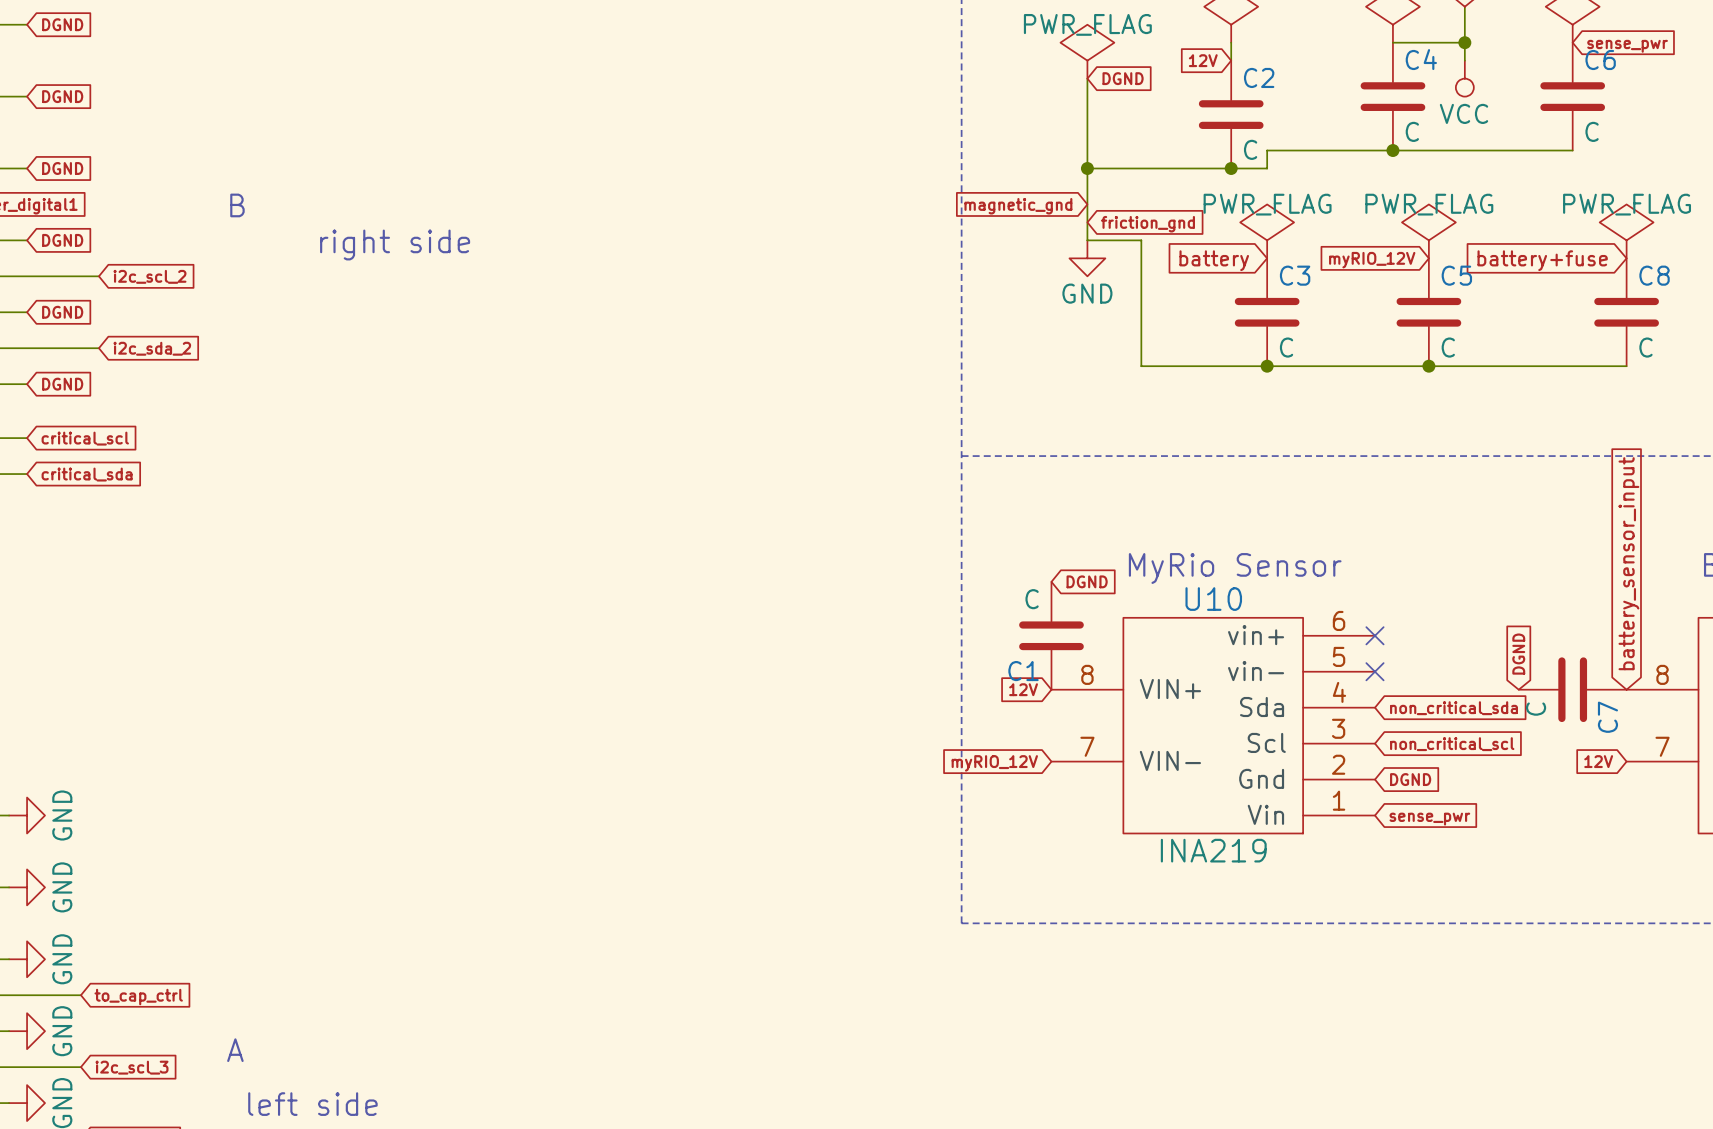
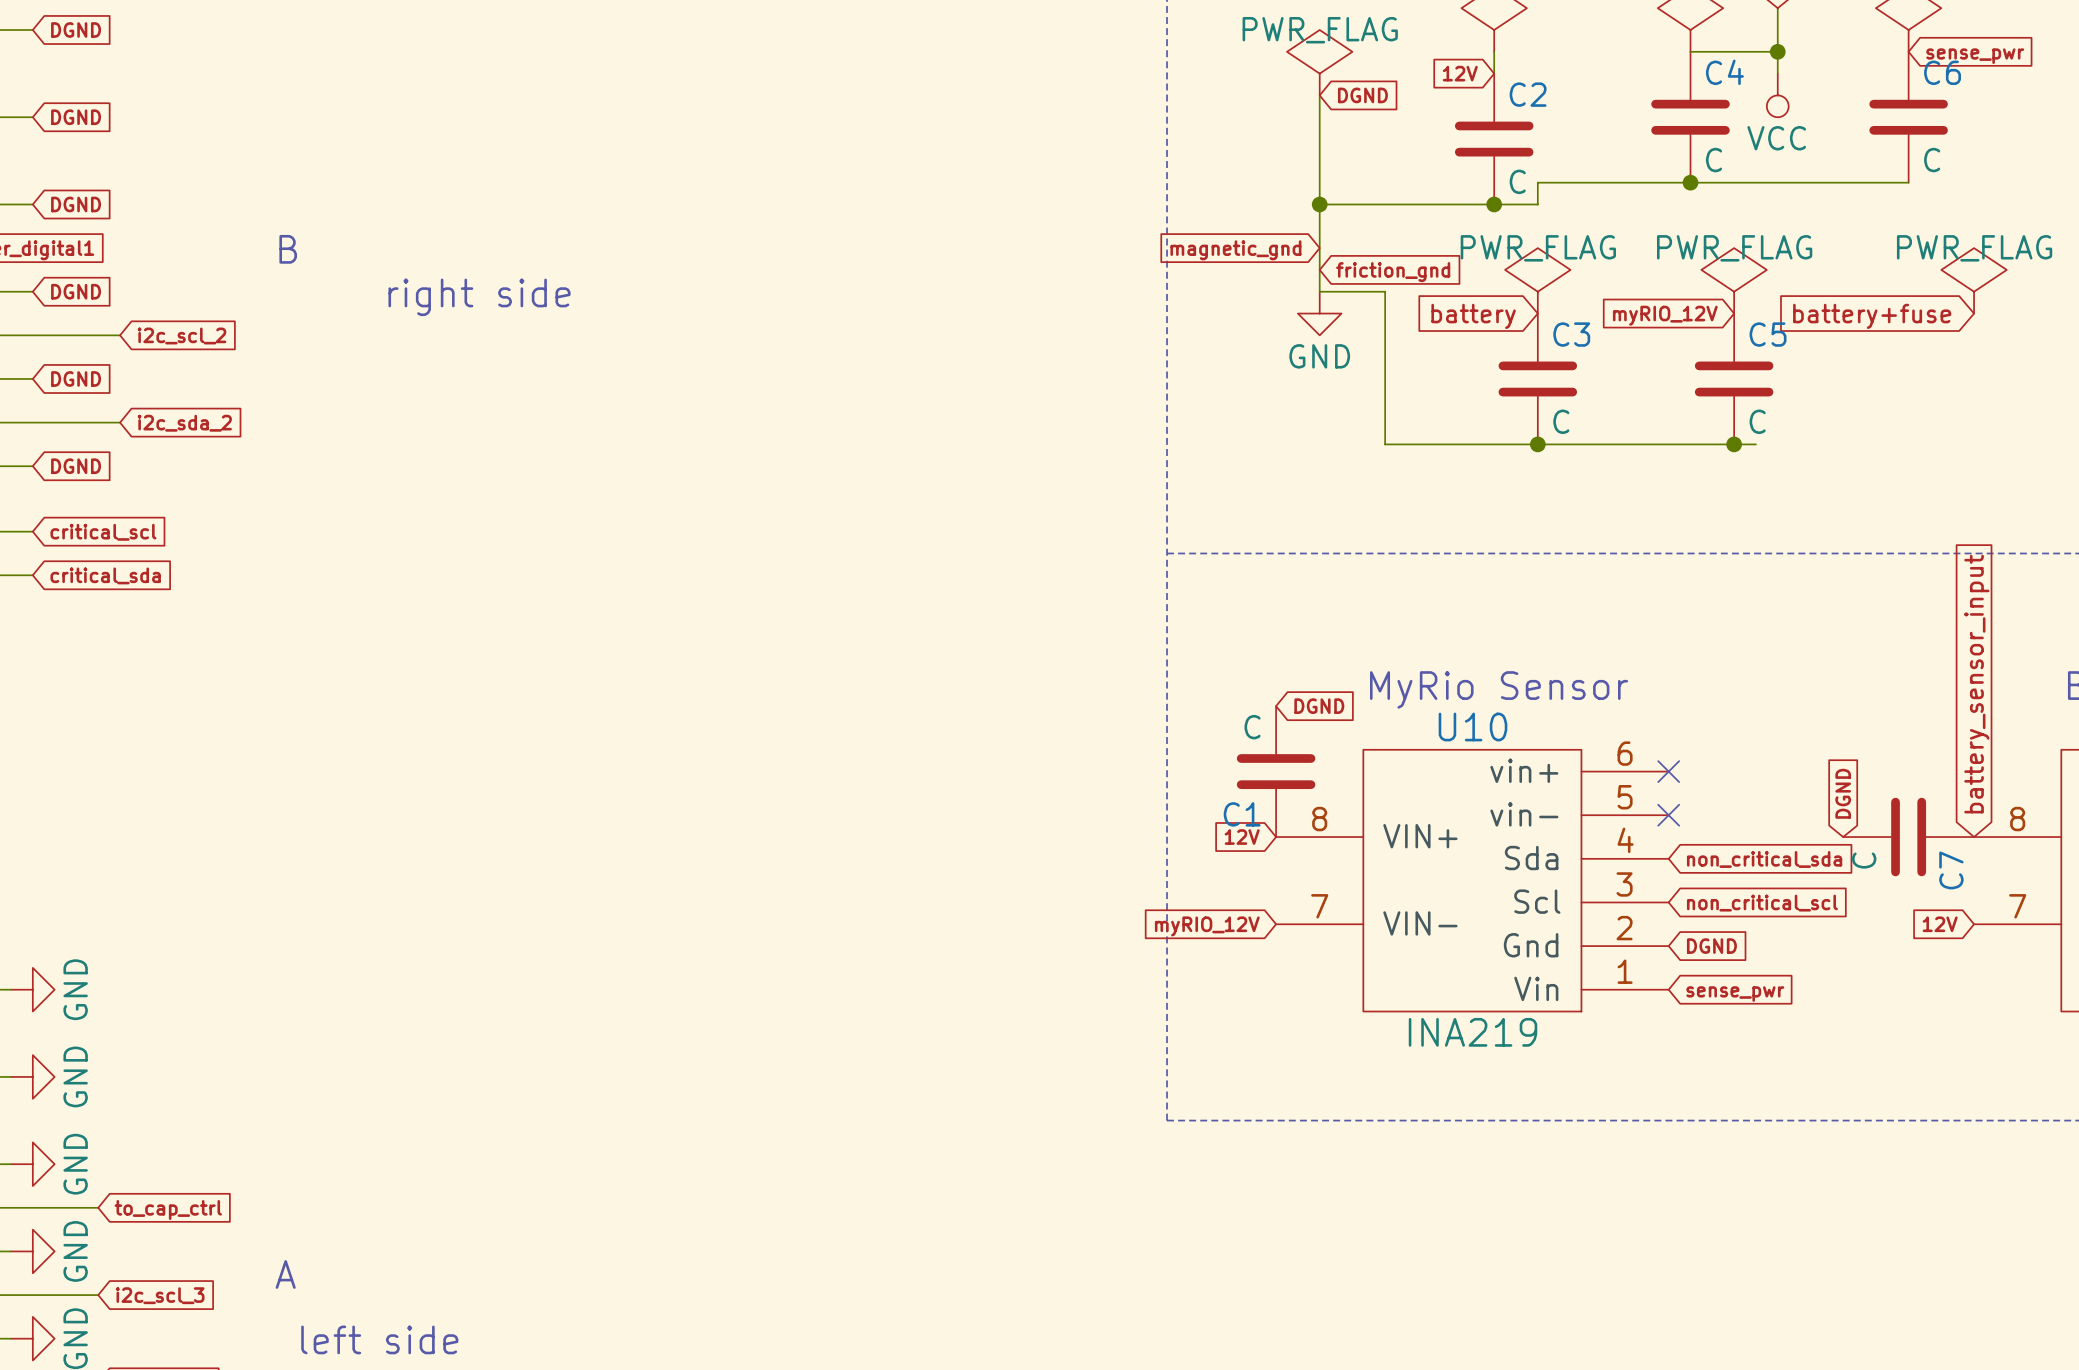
C8: C (1626, 312) -> none
wire: (1446, 366) (1626, 366) -> none

